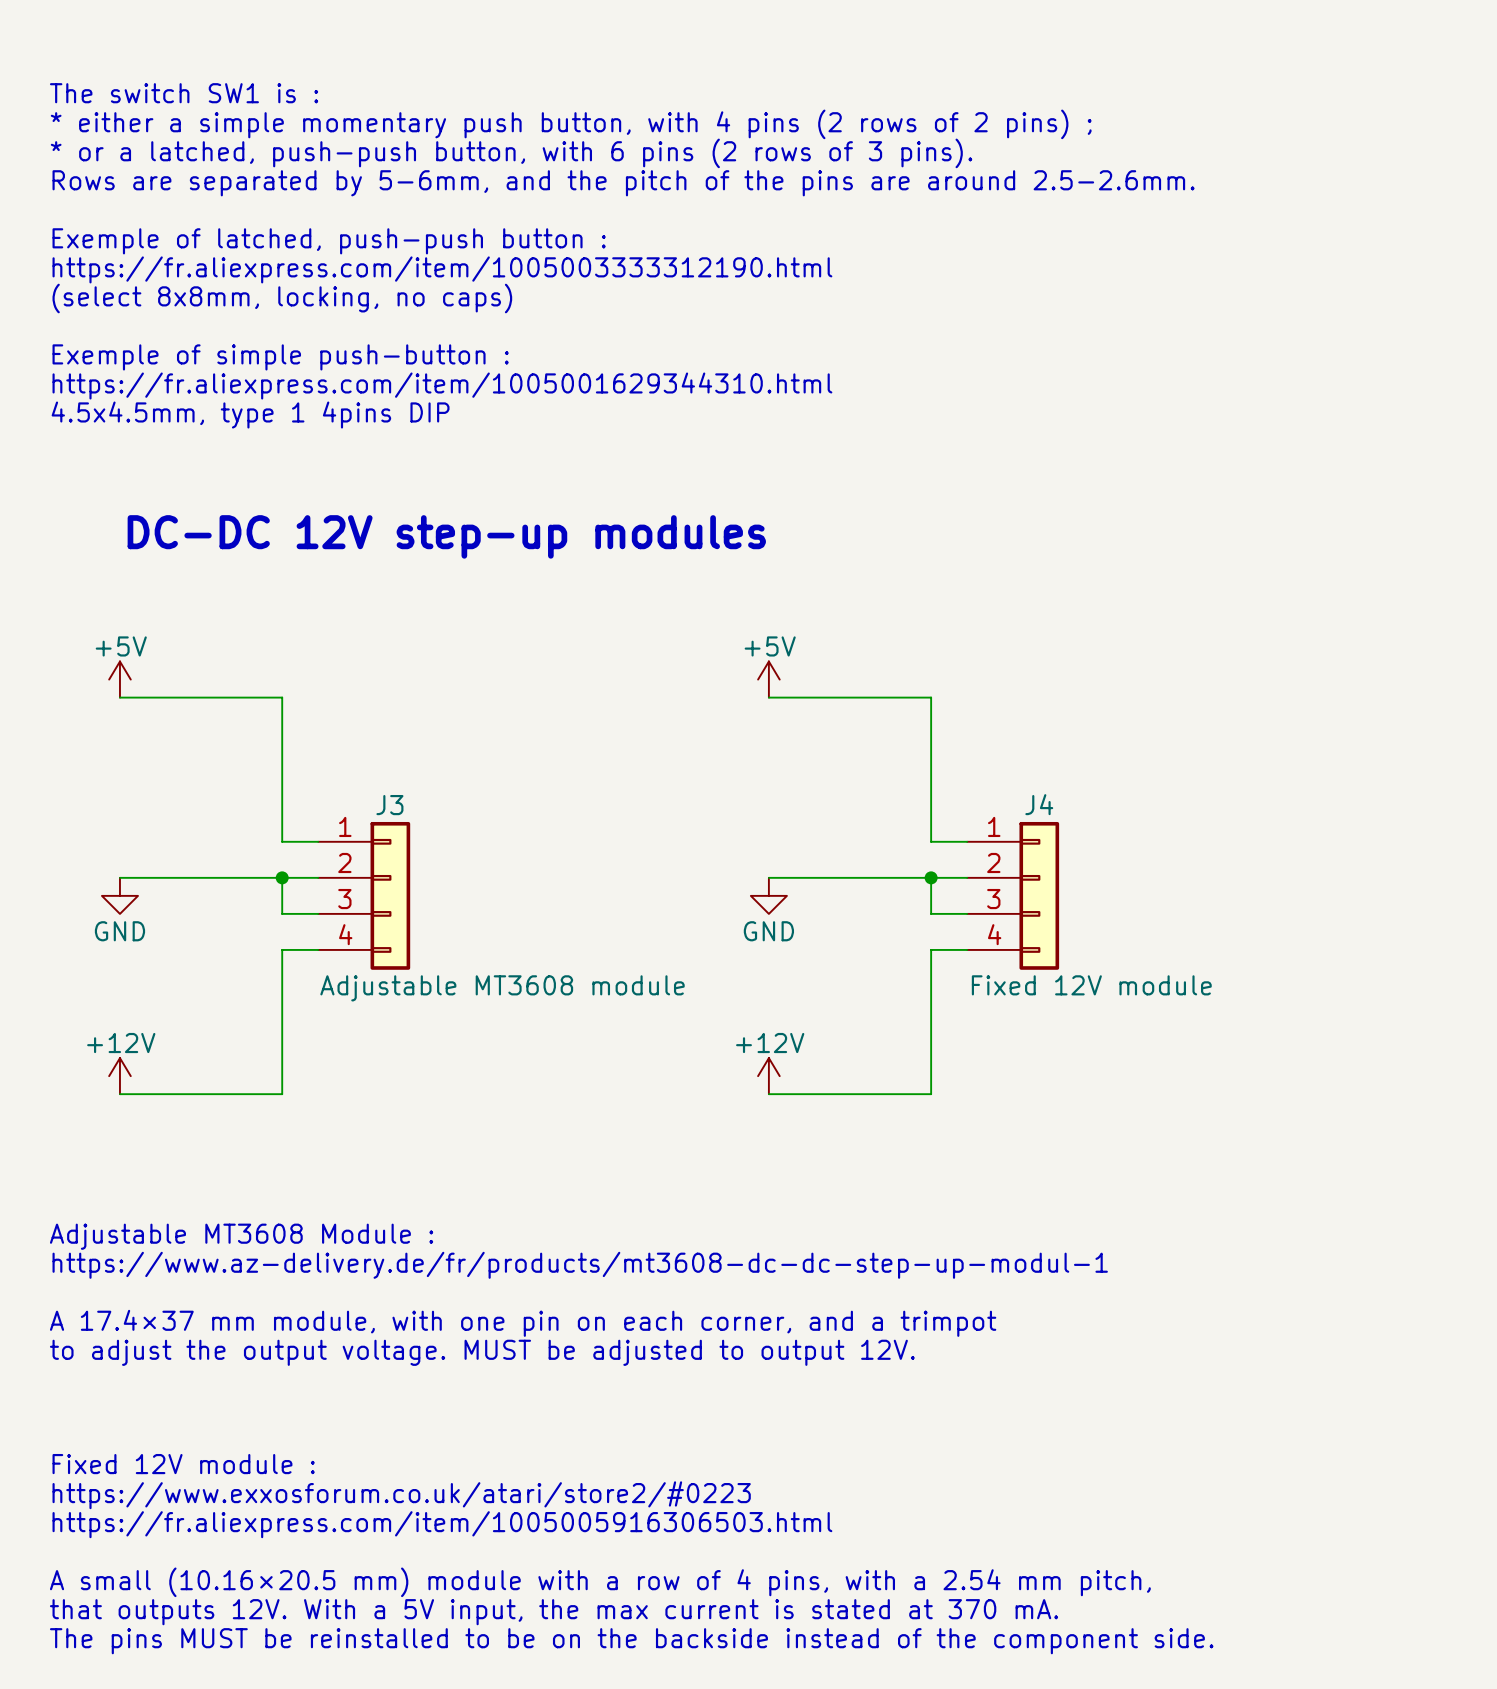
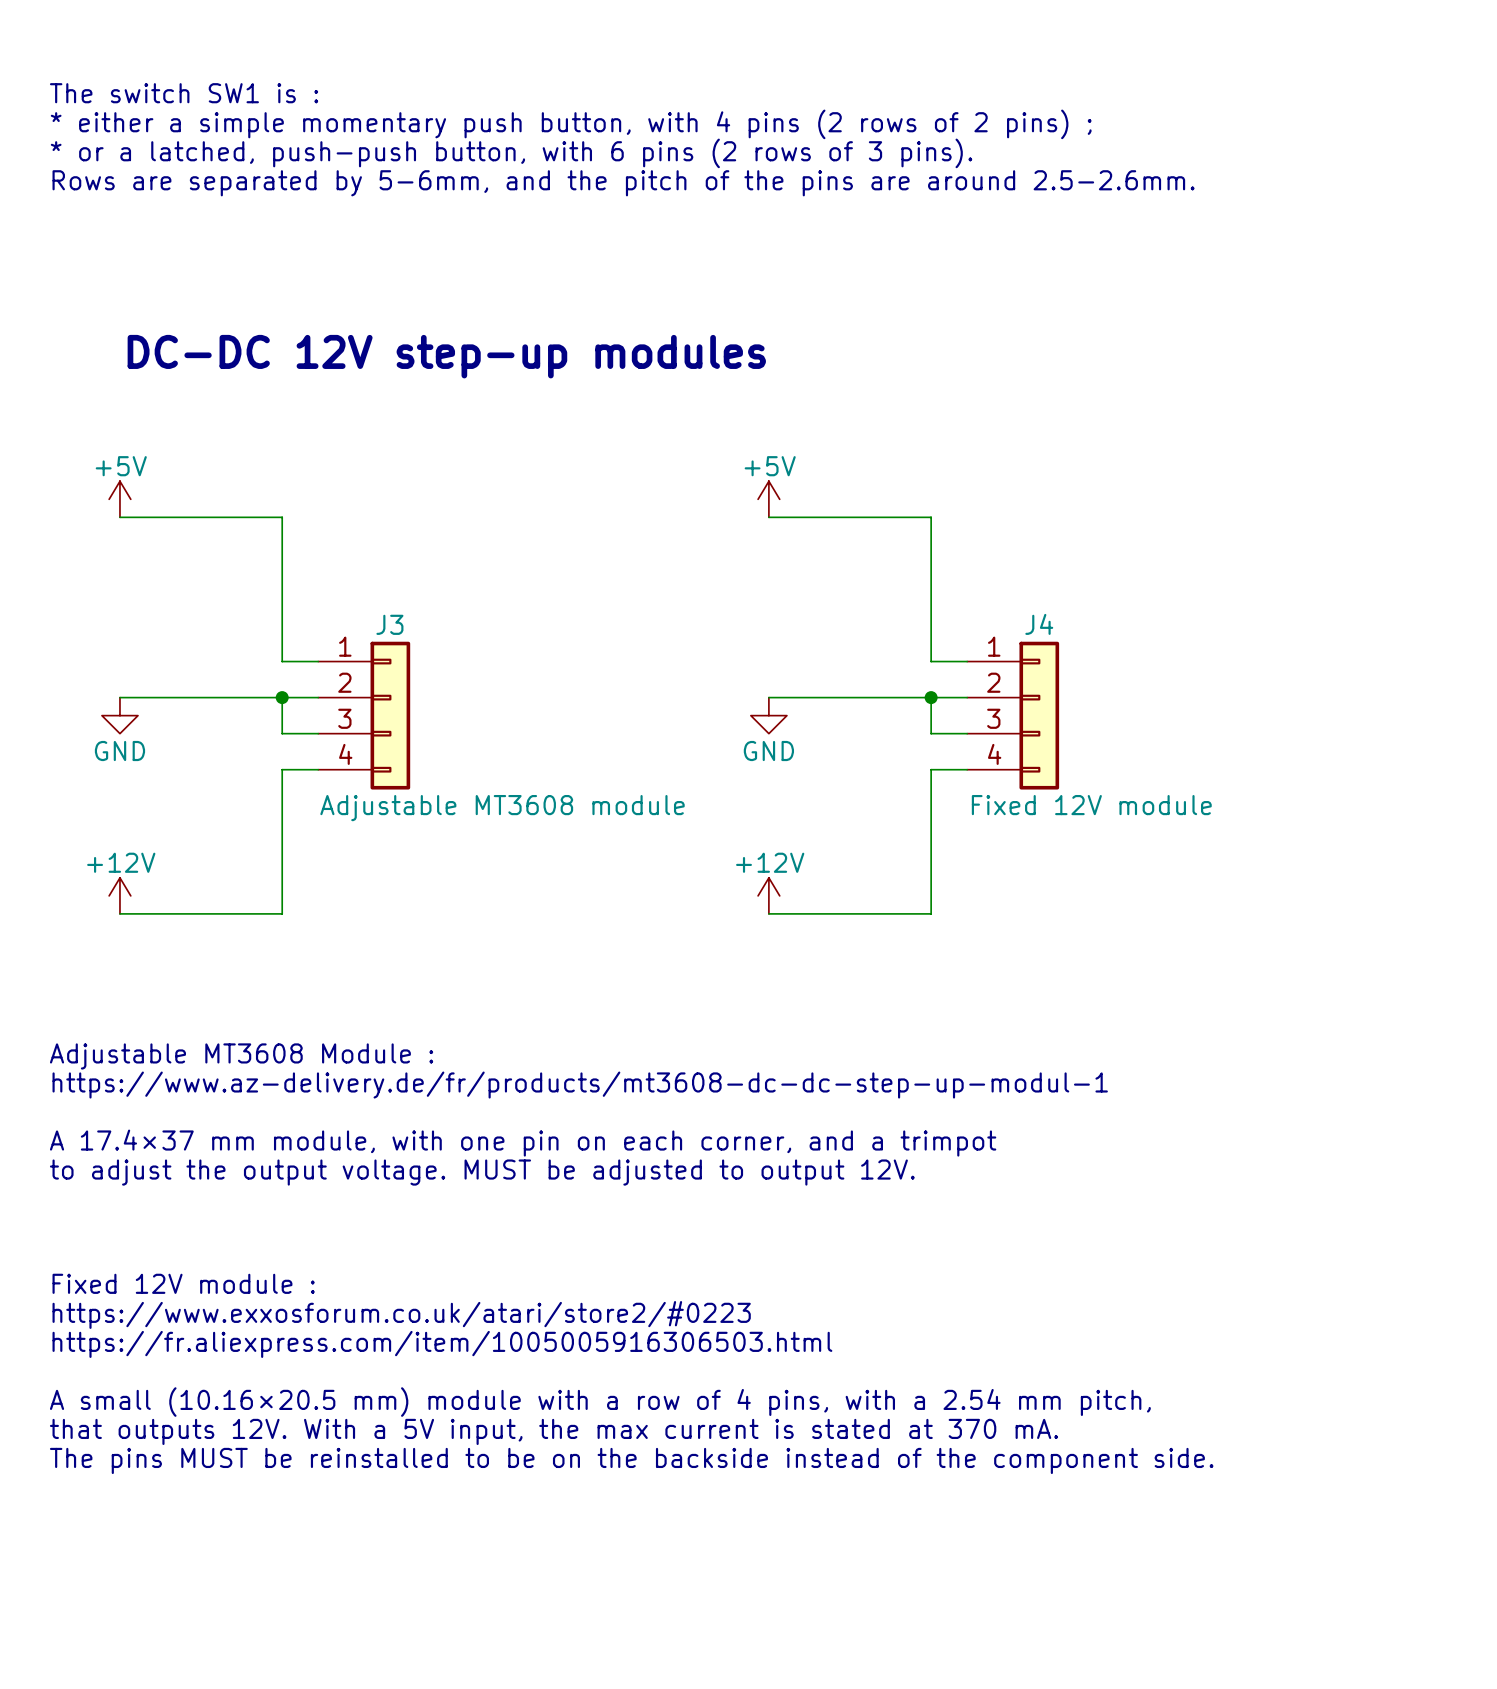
text: Exemple of latched, push-push button : (329, 241) -> none
text: https://fr.aliexpress.com/item/1005003333312190.html (442, 269) -> none
text: (select 8x8mm, locking, no caps) (282, 298) -> none
text: Exemple of simple push-button : (280, 357) -> none
text: https://fr.aliexpress.com/item/1005001629344310.html (442, 386) -> none
text: 4.5x4.5mm, type 1 4pins DIP (250, 415) -> none
wire: none -> (119, 517) (282, 517) (282, 661) (318, 661)
wire: none -> (768, 517) (931, 517) (931, 661) (967, 661)
text position: DC-DC 12V step-up modules (446, 536) -> DC-DC 12V step-up modules (446, 356)
power symbol position: +5V (119, 679) -> +5V (119, 499)
power symbol position: +5V (768, 679) -> +5V (768, 499)
wire: none -> (282, 697) (318, 697)
junction: none -> (282, 697)
wire: none -> (931, 697) (967, 697)
junction: none -> (931, 697)
power symbol: none -> GND (119, 715)
power symbol: none -> GND (768, 715)
wire: (282, 733) (282, 769) -> (282, 733) (318, 733)
wire: (931, 733) (931, 769) -> (931, 733) (967, 733)
wire: none -> (282, 769) (318, 769)
wire: none -> (931, 769) (967, 769)
wire: (282, 841) (318, 841) -> (282, 841) (282, 877)
wire: (931, 841) (967, 841) -> (931, 841) (931, 877)
wire: (119, 877) (318, 877) -> none
junction: (282, 877) -> none
wire: (768, 877) (967, 877) -> none
junction: (931, 877) -> none
power symbol: GND (119, 895) -> +12V (119, 895)
J3 position: (364, 895) -> (364, 715)
power symbol: GND (768, 895) -> +12V (768, 895)
J4 position: (1013, 895) -> (1013, 715)
wire: (282, 913) (318, 913) -> (282, 913) (119, 913)
wire: (931, 913) (967, 913) -> (931, 913) (768, 913)
wire: (318, 949) (282, 949) (282, 1094) (119, 1094) -> none
wire: (967, 949) (931, 949) (931, 1094) (768, 1094) -> none
power symbol: +12V (119, 1076) -> none
power symbol: +12V (768, 1076) -> none
text position: Adjustable MT3608 Module : (241, 1236) -> Adjustable MT3608 Module : (241, 1056)
text position: https://www.az-delivery.de/fr/products/mt3608-dc-dc-step-up-modul-1 (580, 1265) -> https://www.az-delivery.de/fr/products/mt3608-dc-dc-step-up-modul-1 (580, 1085)
text position: A 17.4×37 mm module, with one pin on each corner, and a trimpot (523, 1323) -> A 17.4×37 mm module, with one pin on each corner, and a trimpot (523, 1143)
text position: to adjust the output voltage. MUST be adjusted to output 12V. (482, 1352) -> to adjust the output voltage. MUST be adjusted to output 12V. (482, 1172)
text position: Fixed 12V module : (183, 1464) -> Fixed 12V module : (183, 1283)
text position: https://www.exxosforum.co.uk/atari/store2/#0223 (401, 1495) -> https://www.exxosforum.co.uk/atari/store2/#0223 (401, 1314)
text position: https://fr.aliexpress.com/item/1005005916306503.html (442, 1524) -> https://fr.aliexpress.com/item/1005005916306503.html (442, 1344)
text position: A small (10.16×20.5 mm) module with a row of 4 pins, with a 2.54 mm pitch, (600, 1582) -> A small (10.16×20.5 mm) module with a row of 4 pins, with a 2.54 mm pitch, (600, 1402)
text position: that outputs 12V. With a 5V input, the max current is stated at 370 mA. (554, 1612) -> that outputs 12V. With a 5V input, the max current is stated at 370 mA. (554, 1431)
text position: The pins MUST be reinstalled to be on the backside instead of the component side. (631, 1641) -> The pins MUST be reinstalled to be on the backside instead of the component side. (631, 1460)

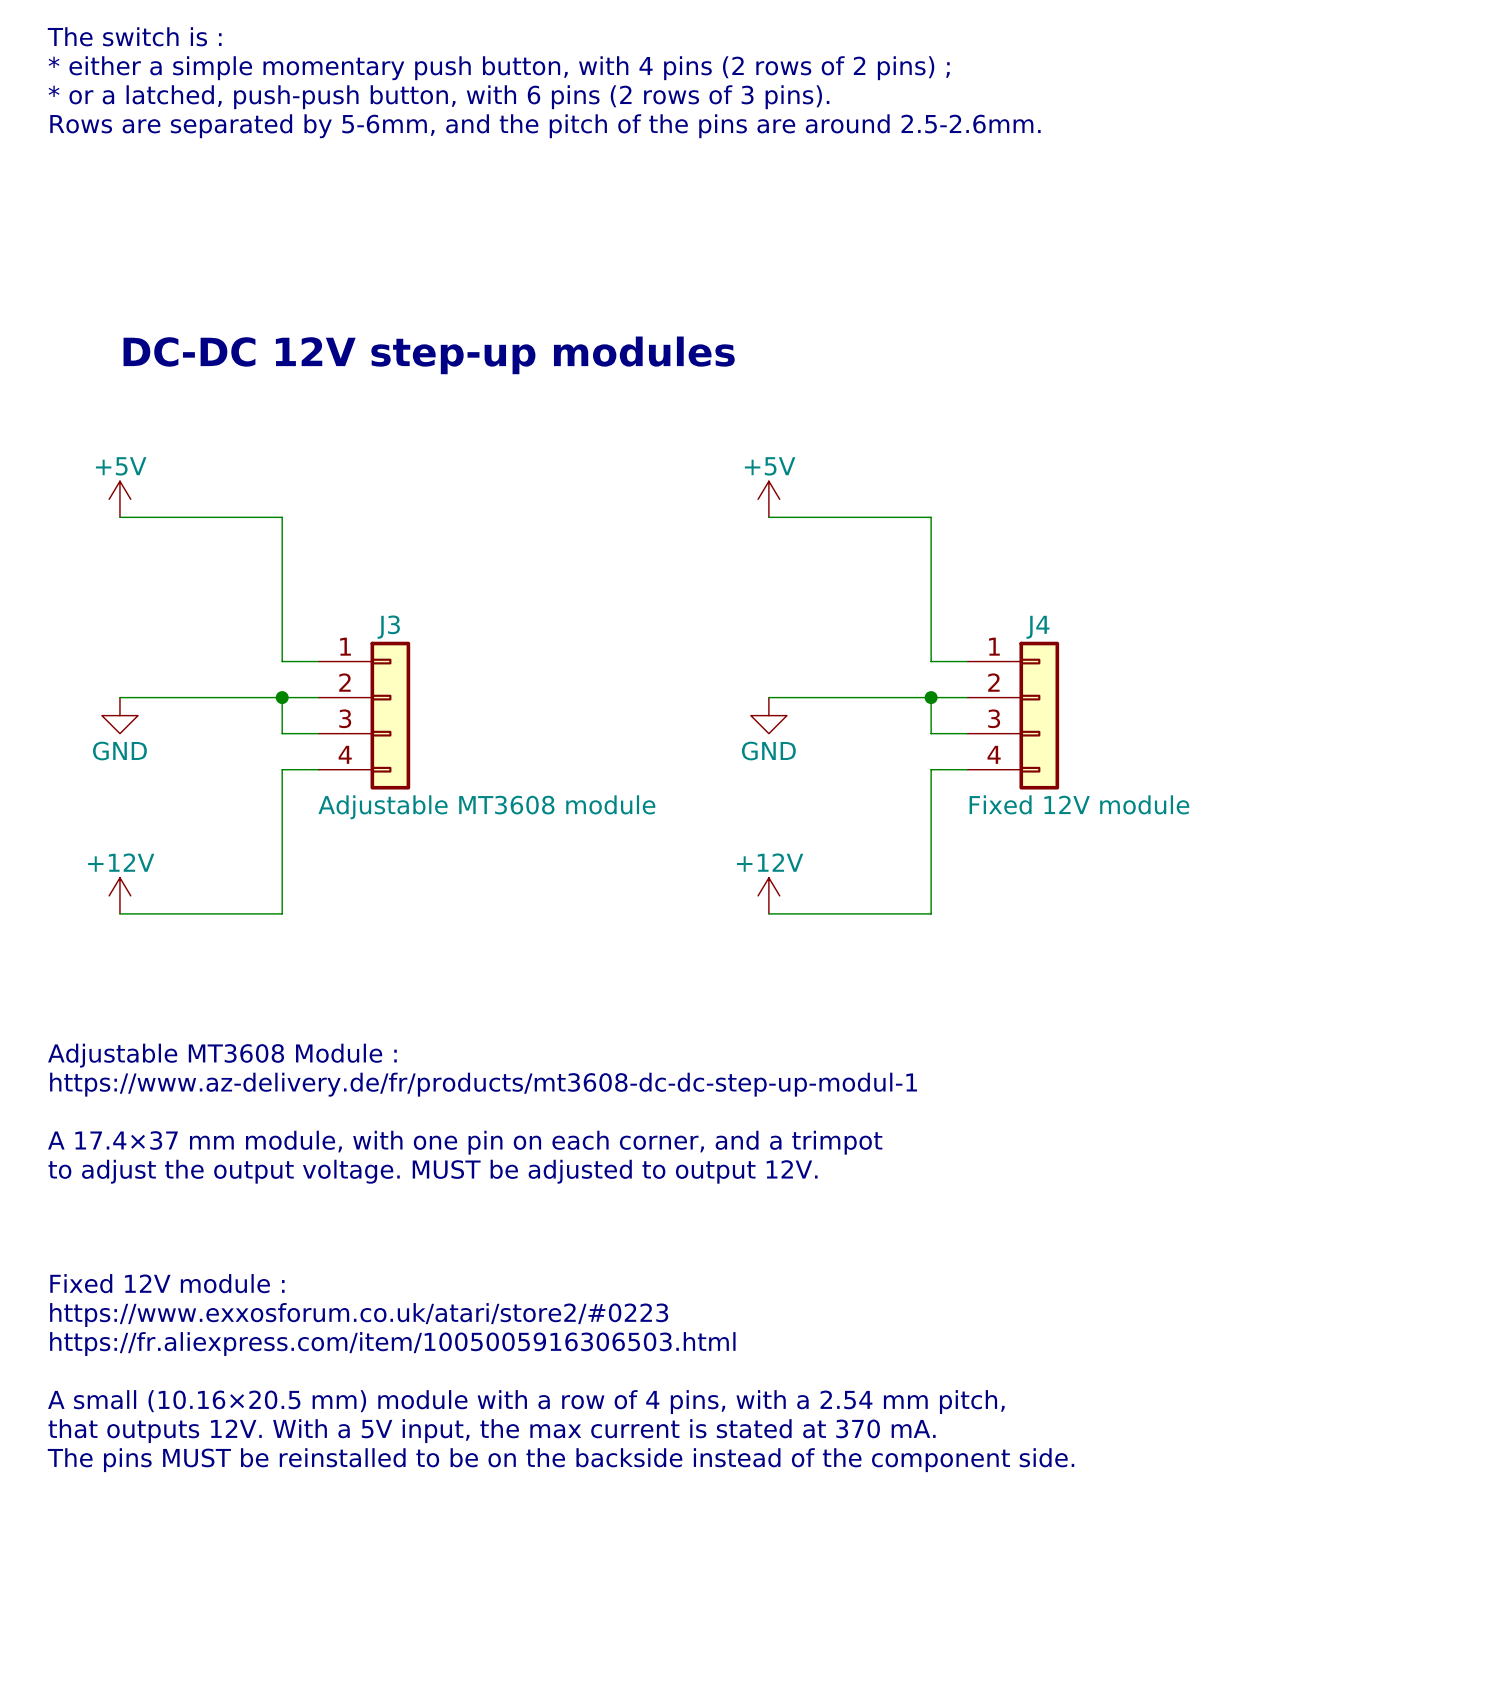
text: none -> The switch is : (134, 36)
text: The switch SW1 is : (184, 93) -> none
text position: * either a simple momentary push button, with 4 pins (2 rows of 2 pins) ; (571, 124) -> * either a simple momentary push button, with 4 pins (2 rows of 2 pins) ; (499, 68)
text position: * or a latched, push-push button, with 6 pins (2 rows of 3 pins). (511, 153) -> * or a latched, push-push button, with 6 pins (2 rows of 3 pins). (438, 97)
text position: Rows are separated by 5-6mm, and the pitch of the pins are around 2.5-2.6mm. (623, 183) -> Rows are separated by 5-6mm, and the pitch of the pins are around 2.5-2.6mm. (545, 126)

